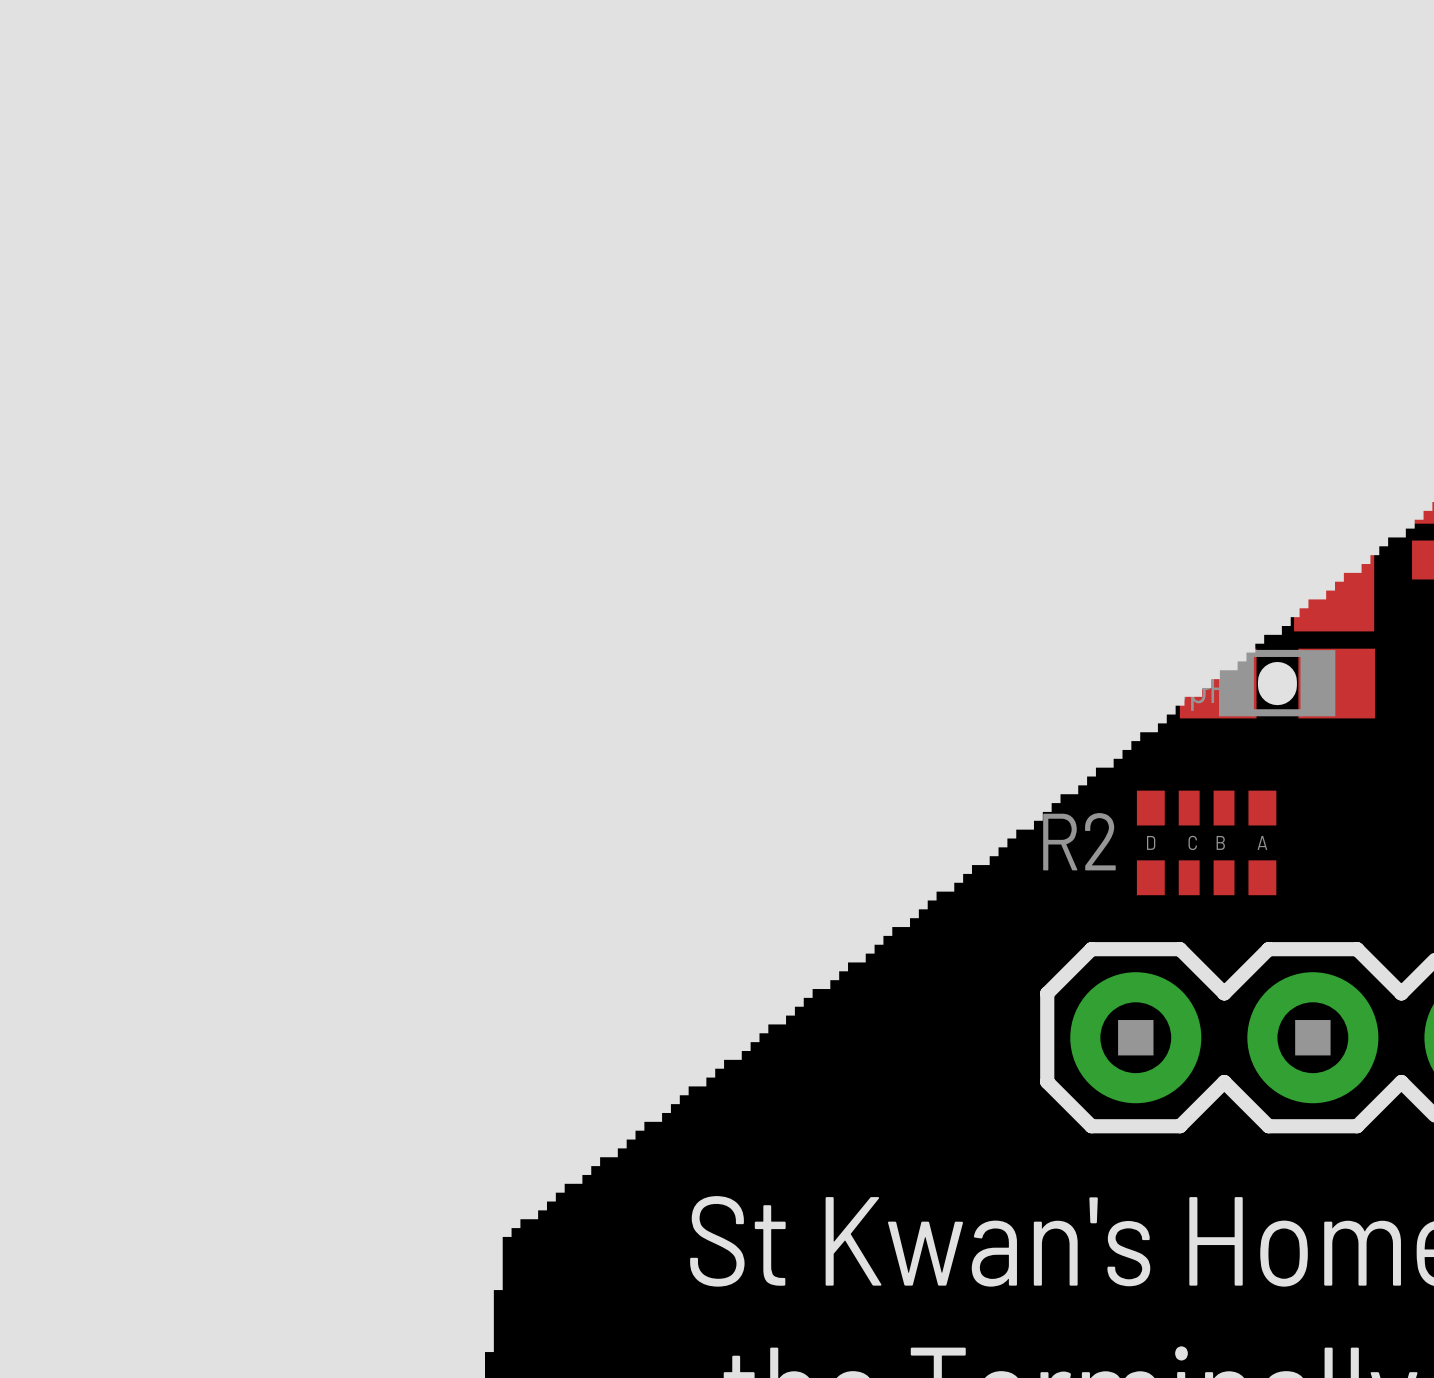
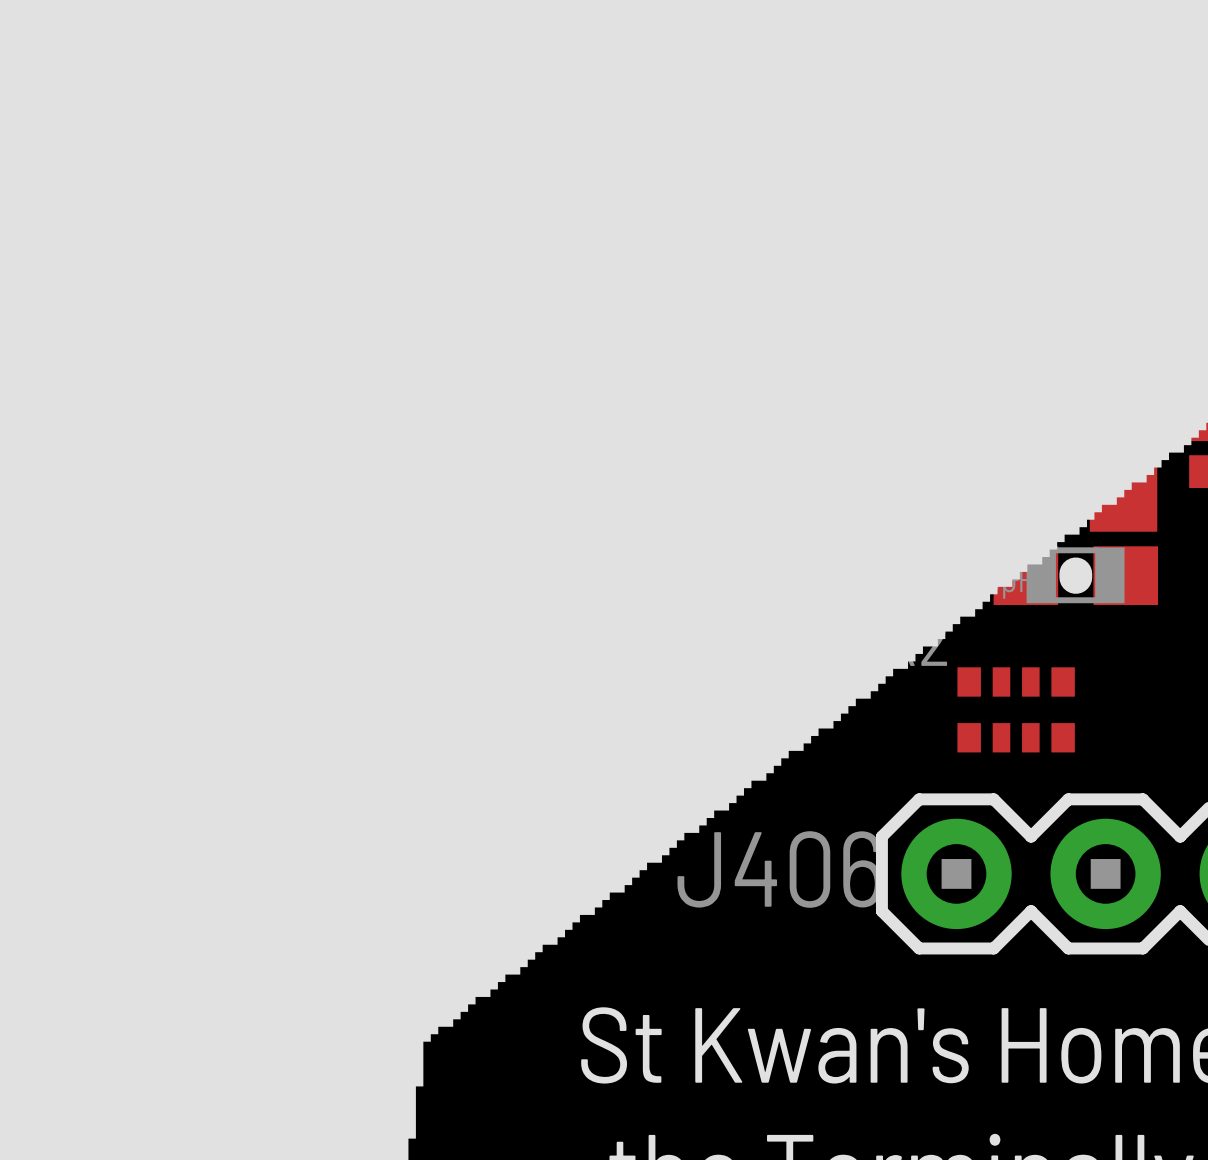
R2 footprint: [1136, 790, 1277, 896] -> [957, 667, 1075, 753]
J406 name: none -> J406 (779, 869)

